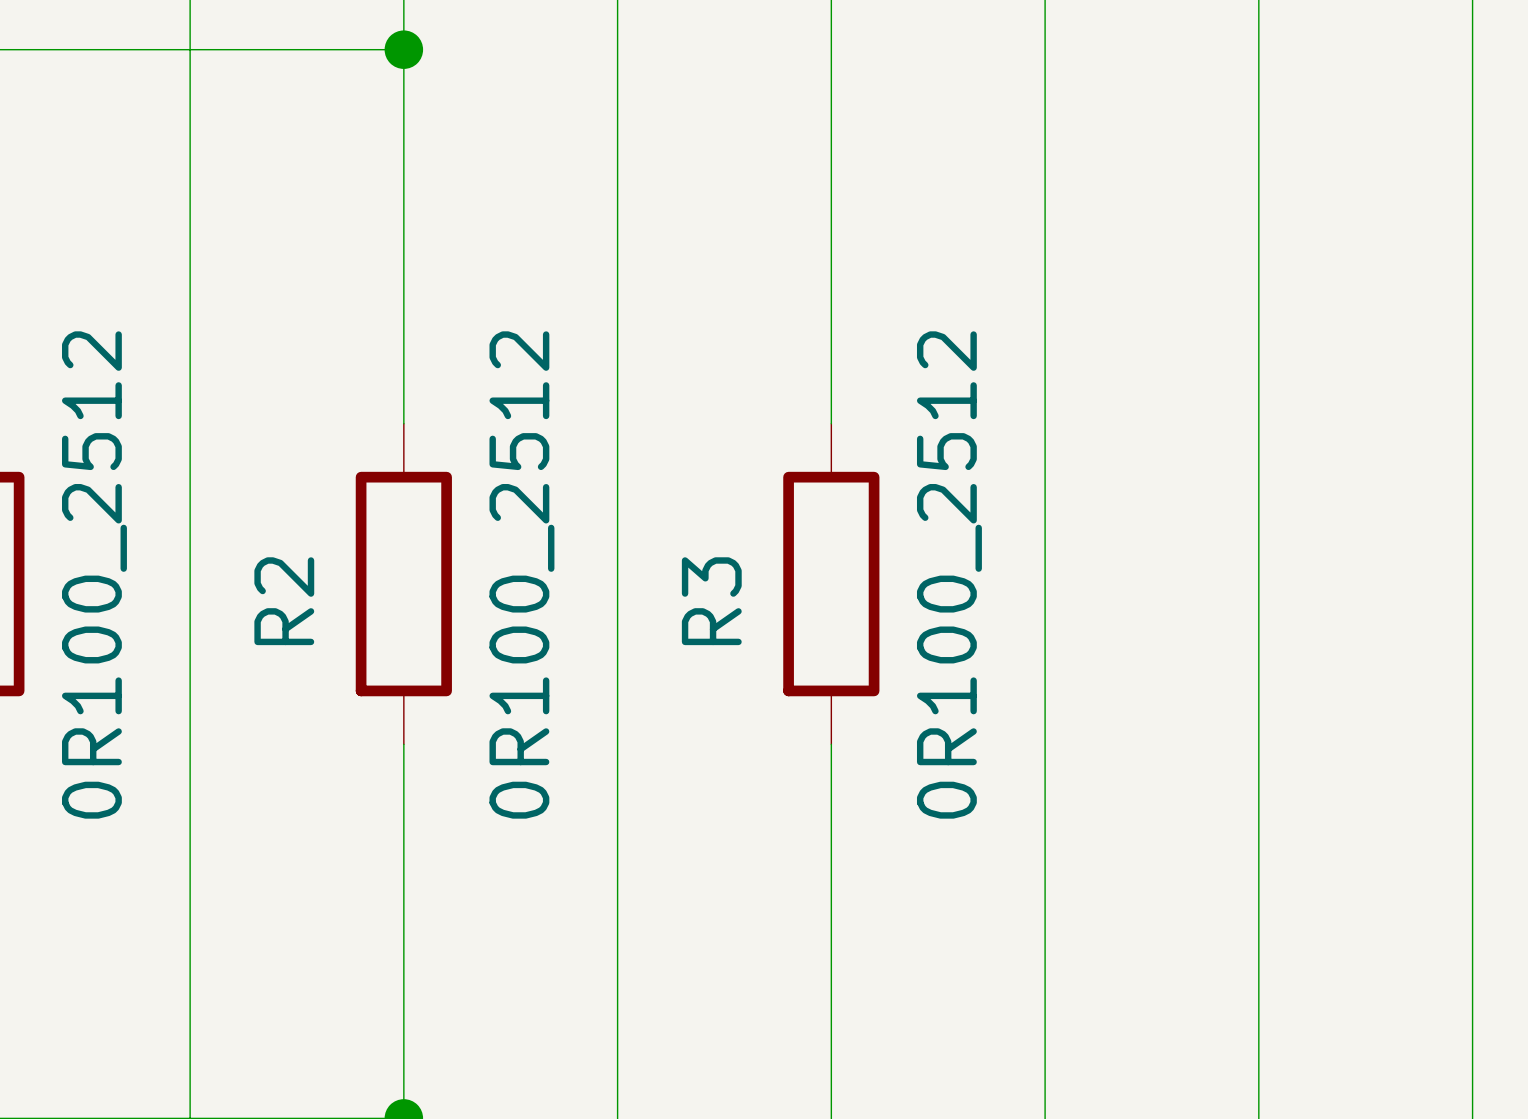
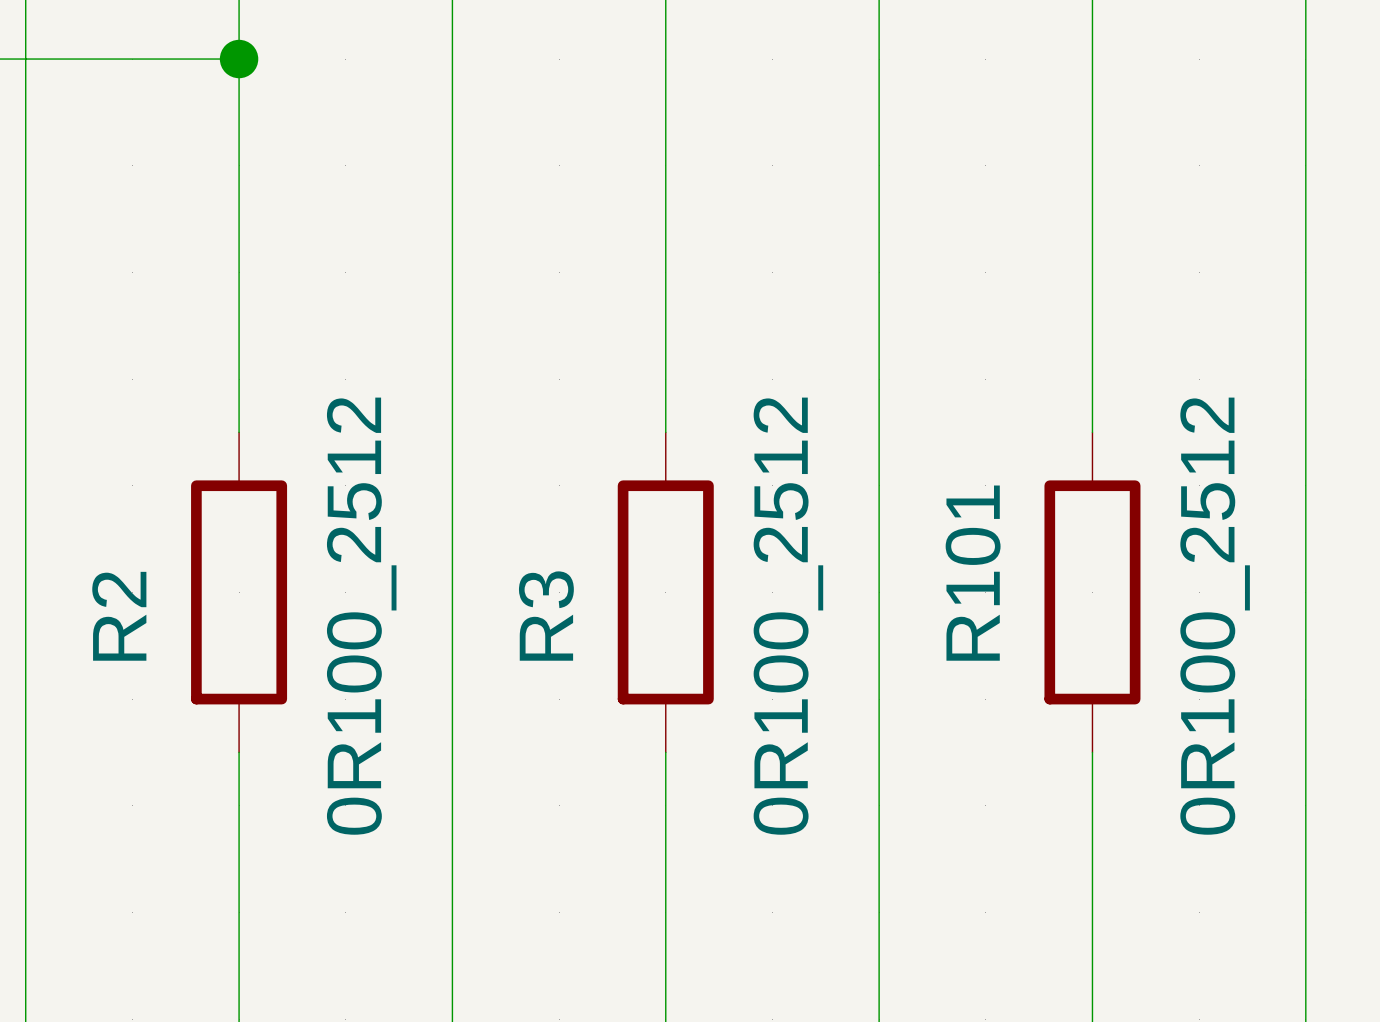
wire: (1258, 423) (1258, 744) -> none
R101: none -> 0R100_2512 (1092, 592)

